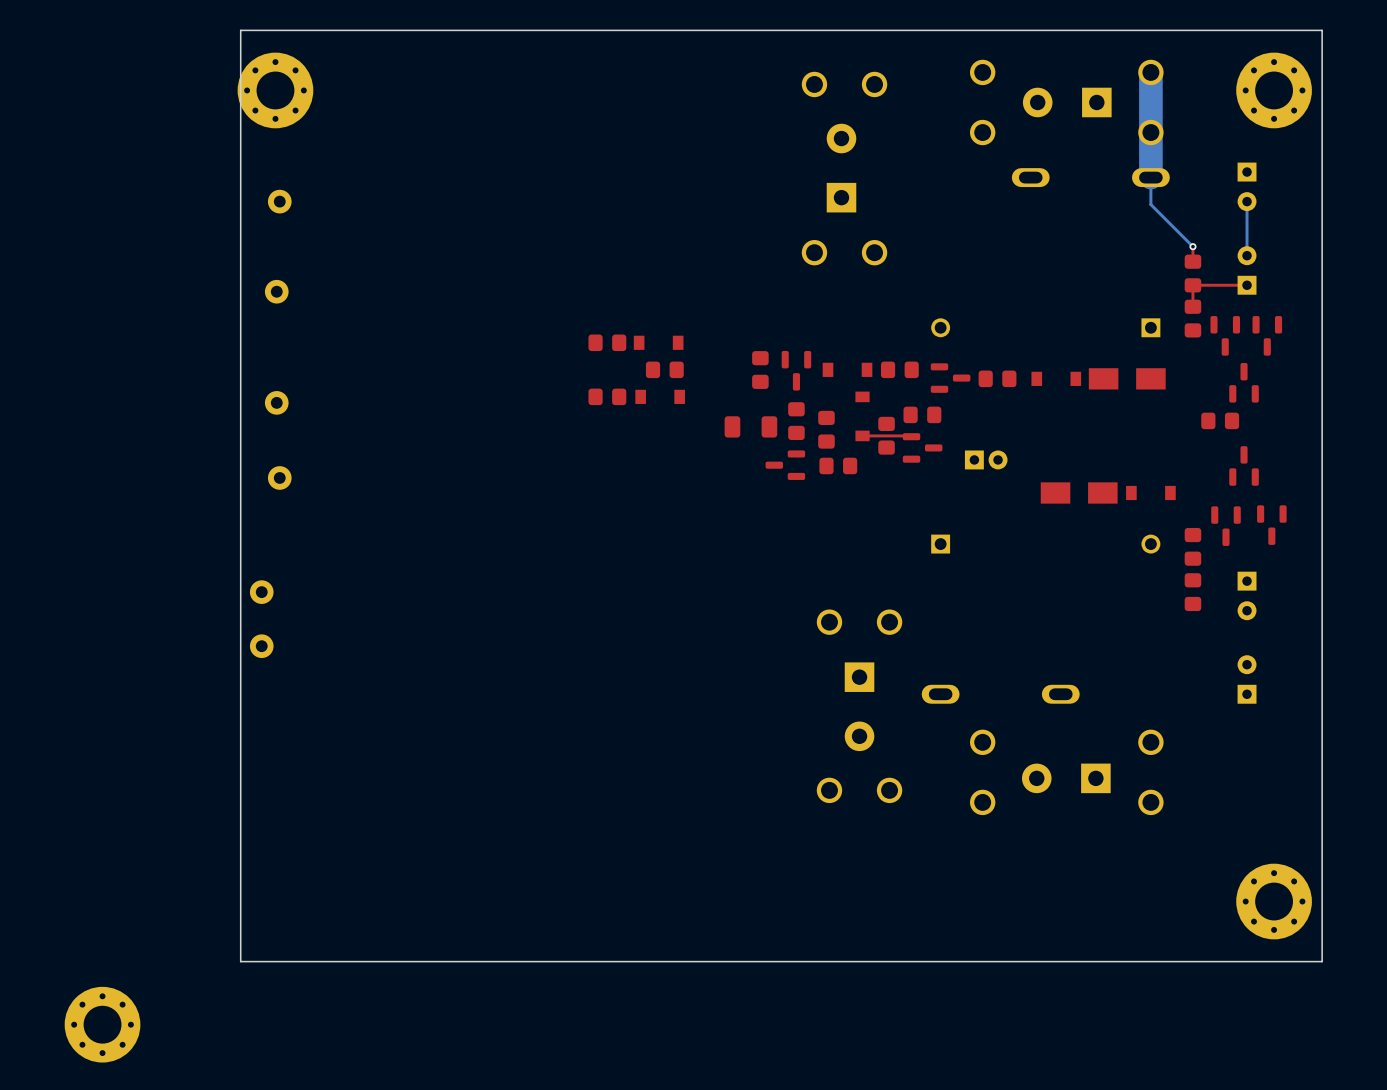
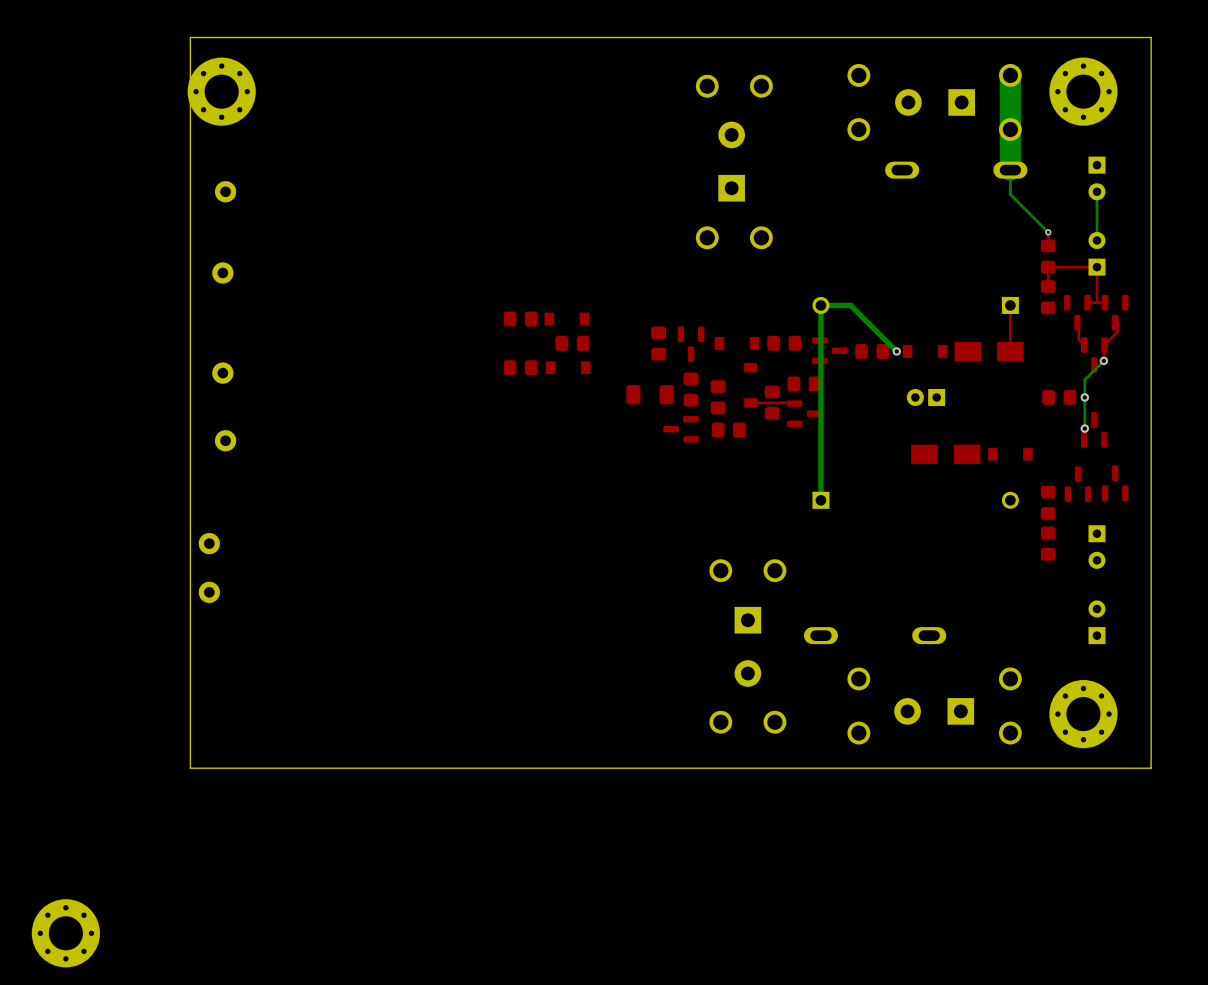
board edge: (1307, 30) (1322, 30) (1322, 961) (240, 961) (240, 841) -> (1151, 37) (1151, 768) (190, 768)
part position: (1274, 90) -> (1083, 91)
top track: none -> (1096, 267) (1096, 302)
top track: none -> (1107, 302) (1088, 302)
top track: none -> (1010, 305) (1010, 351)
top track: none -> (1078, 322) (1078, 339) (1084, 345)
top track: none -> (1117, 322) (1117, 331) (1103, 345) (1103, 360)
bottom track: none -> (896, 351) (850, 305) (820, 305) (820, 500)
via: none -> (896, 351)
part rotation: 0° (1244, 382) -> 180° (1094, 354)
bottom track: none -> (1103, 360) (1084, 379) (1084, 428)
via: none -> (1103, 360)
part position: (1220, 420) -> (1059, 397)
via: none -> (1084, 397)
part rotation: 0° (986, 459) -> 180° (926, 397)
part position: (986, 459) -> (926, 397)
via: none -> (1084, 428)
part rotation: 0° (1271, 525) -> 180° (1115, 483)
part rotation: 0° (1226, 526) -> 180° (1078, 484)
part position: (1274, 901) -> (1083, 714)

